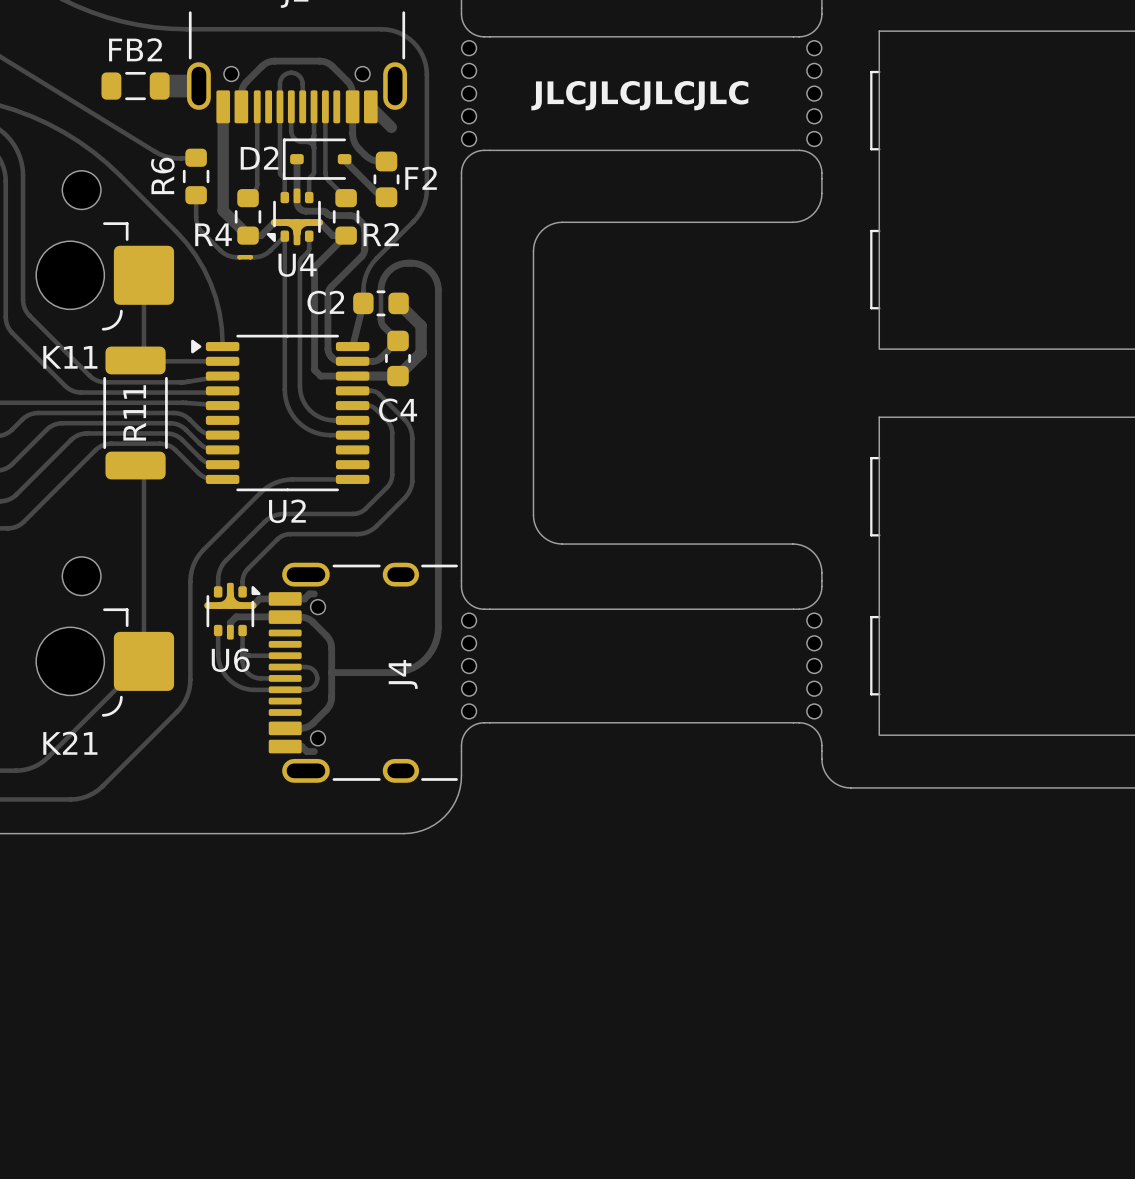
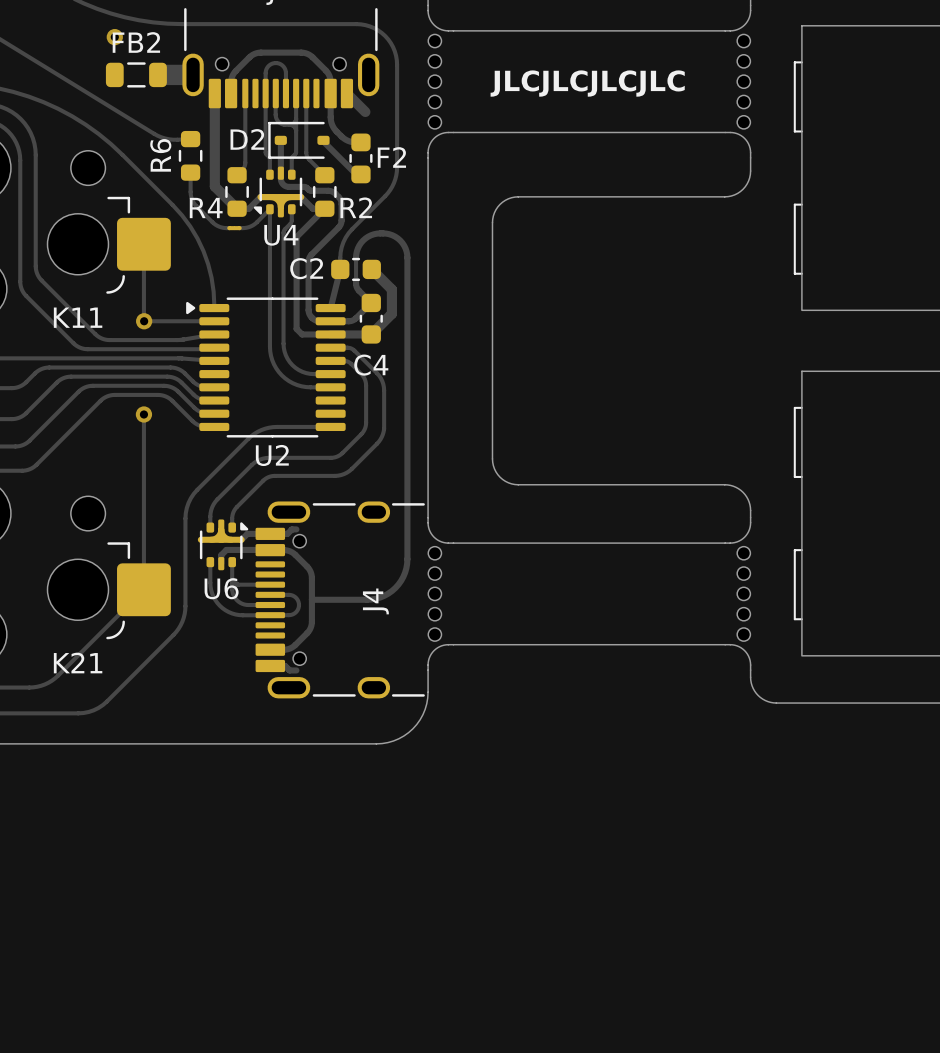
via: none -> (114, 37)
via: none -> (144, 321)
R11: (135, 413) -> none
via: none -> (143, 414)

